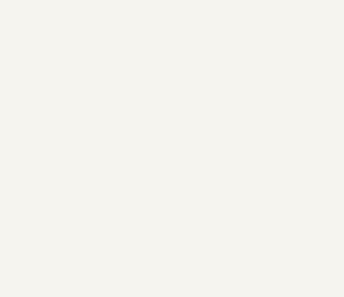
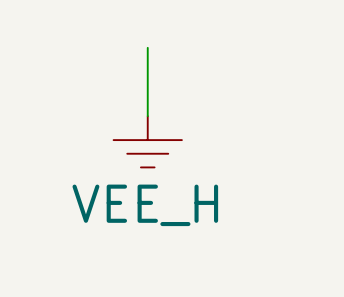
wire: none -> (147, 47) (147, 116)
power symbol: none -> VEE_H (147, 141)

